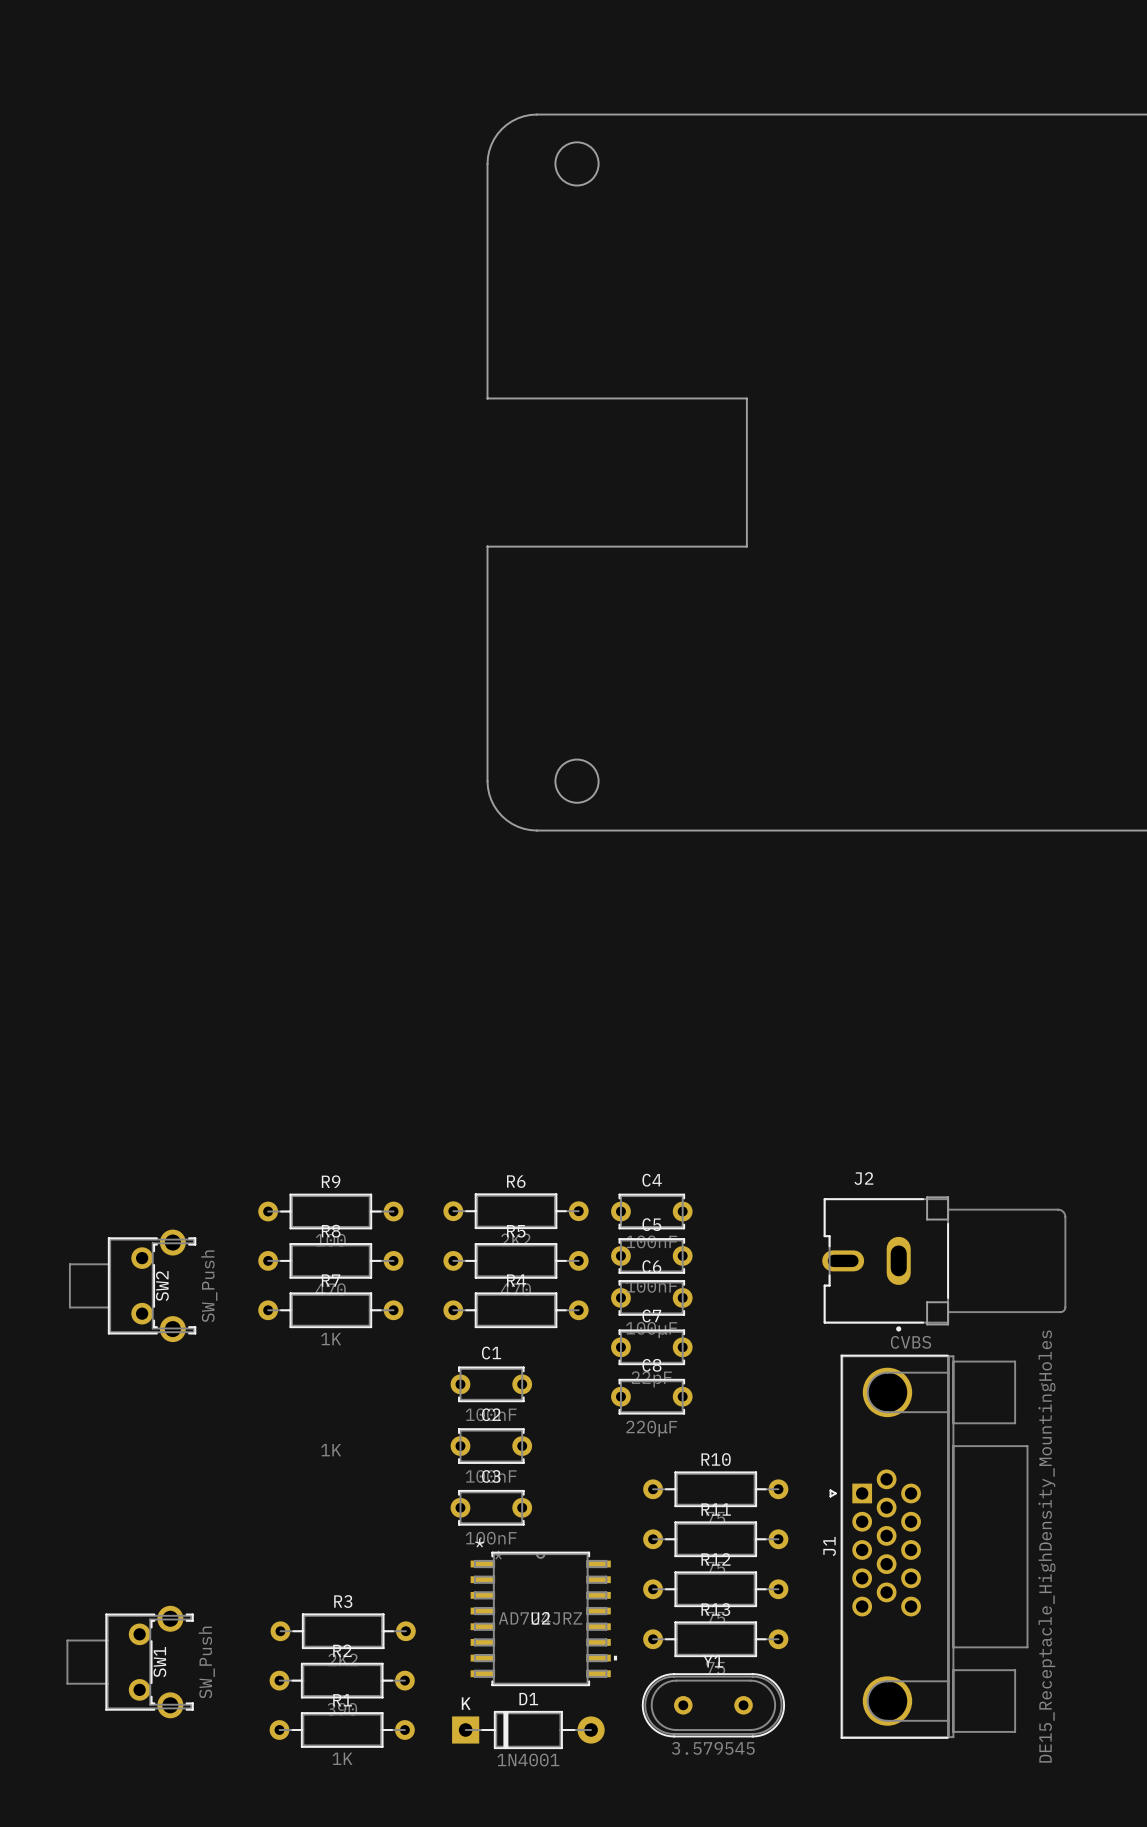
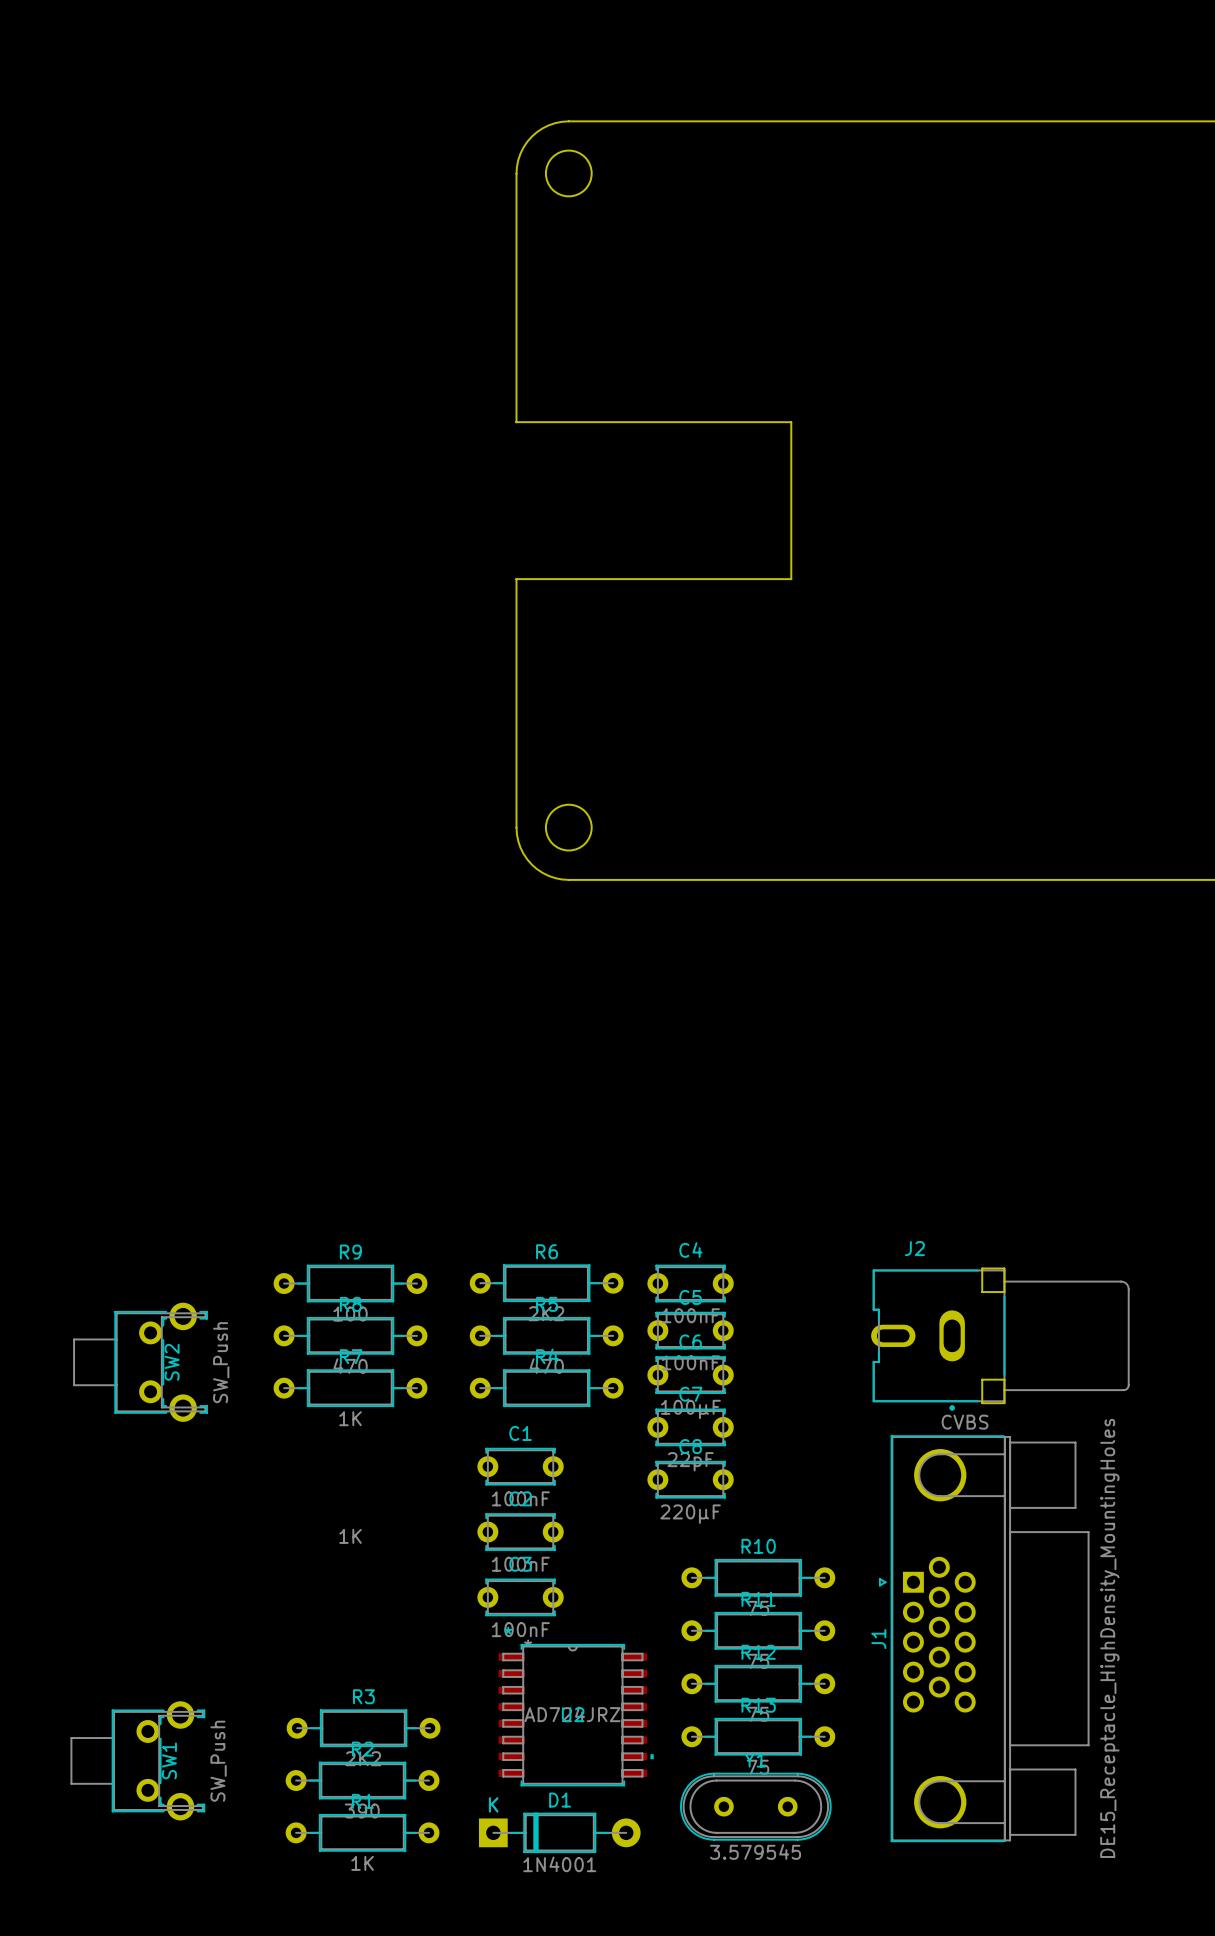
round board edge position: (577, 163) -> (568, 173)
round board edge position: (577, 781) -> (568, 827)

